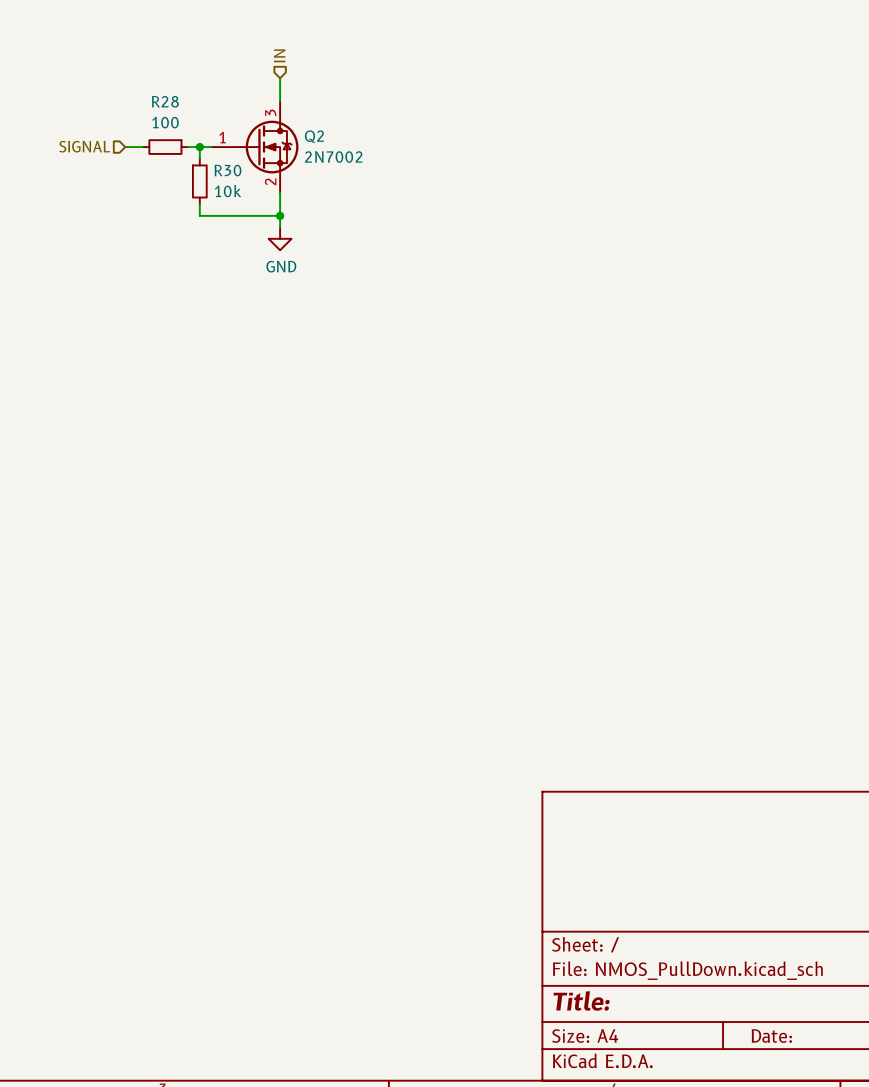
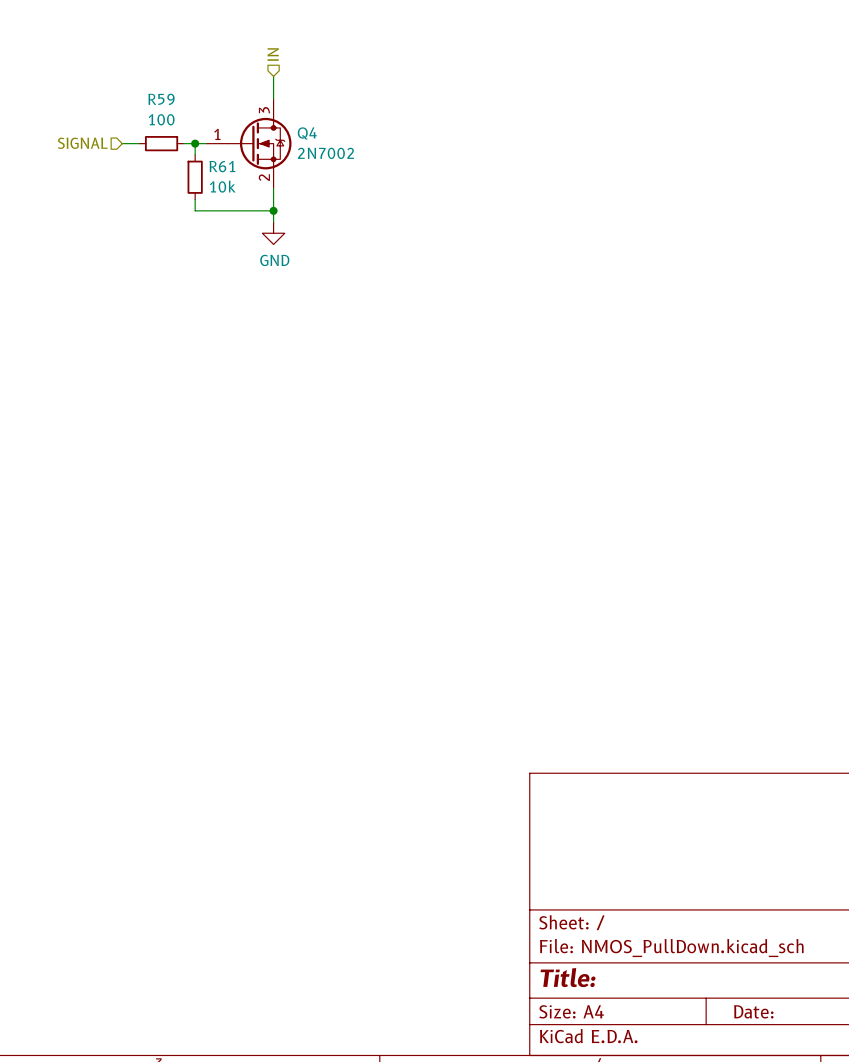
R28 name: R28 (165, 101) -> R59 (161, 99)
Q2 name: Q2 (314, 136) -> Q4 (307, 133)
R30 name: R30 (227, 170) -> R61 (222, 166)

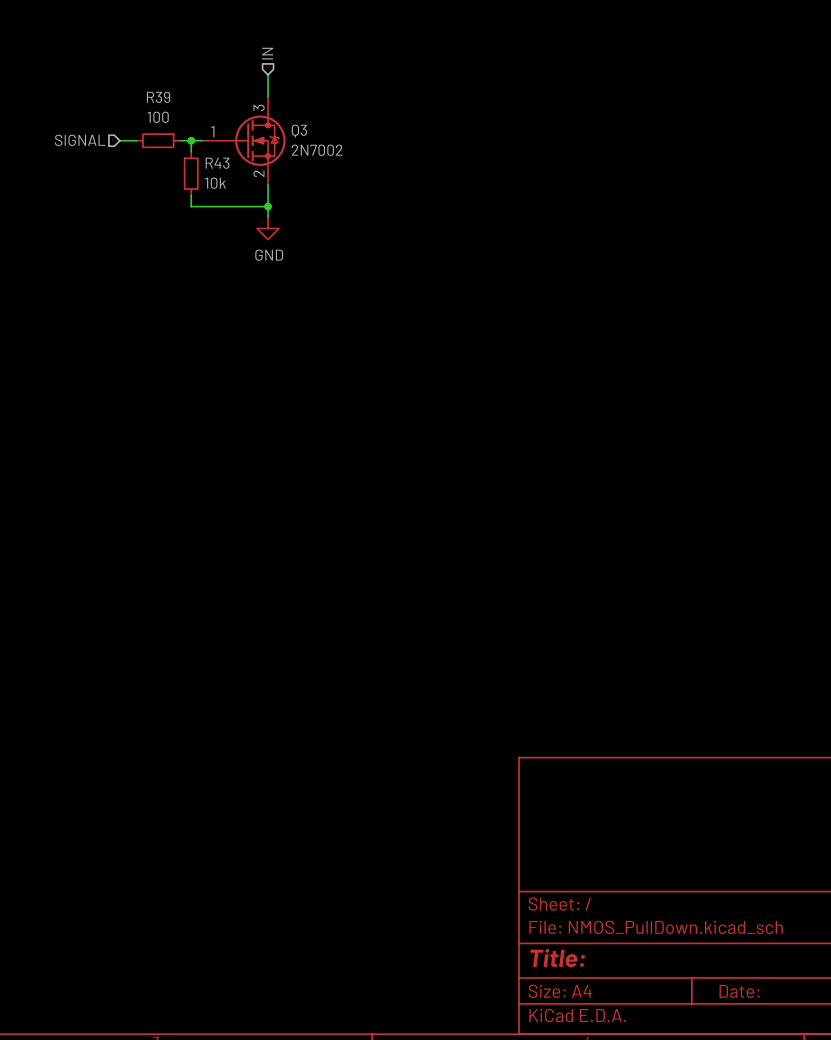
R59 name: R59 (161, 99) -> R39 (158, 97)
Q4 name: Q4 (307, 133) -> Q3 (299, 131)
R61 name: R61 (222, 166) -> R43 (217, 163)

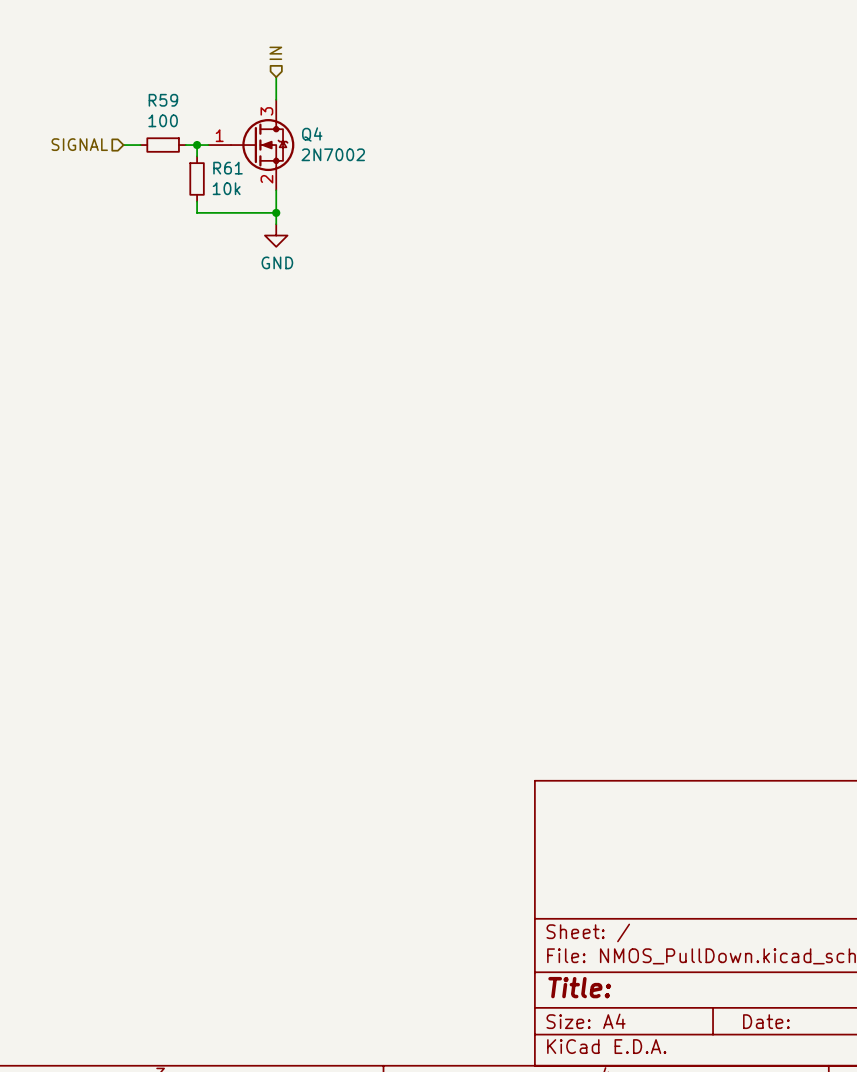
R39 name: R39 (158, 97) -> R59 (163, 100)
Q3 name: Q3 (299, 131) -> Q4 (312, 134)
R43 name: R43 (217, 163) -> R61 (228, 168)

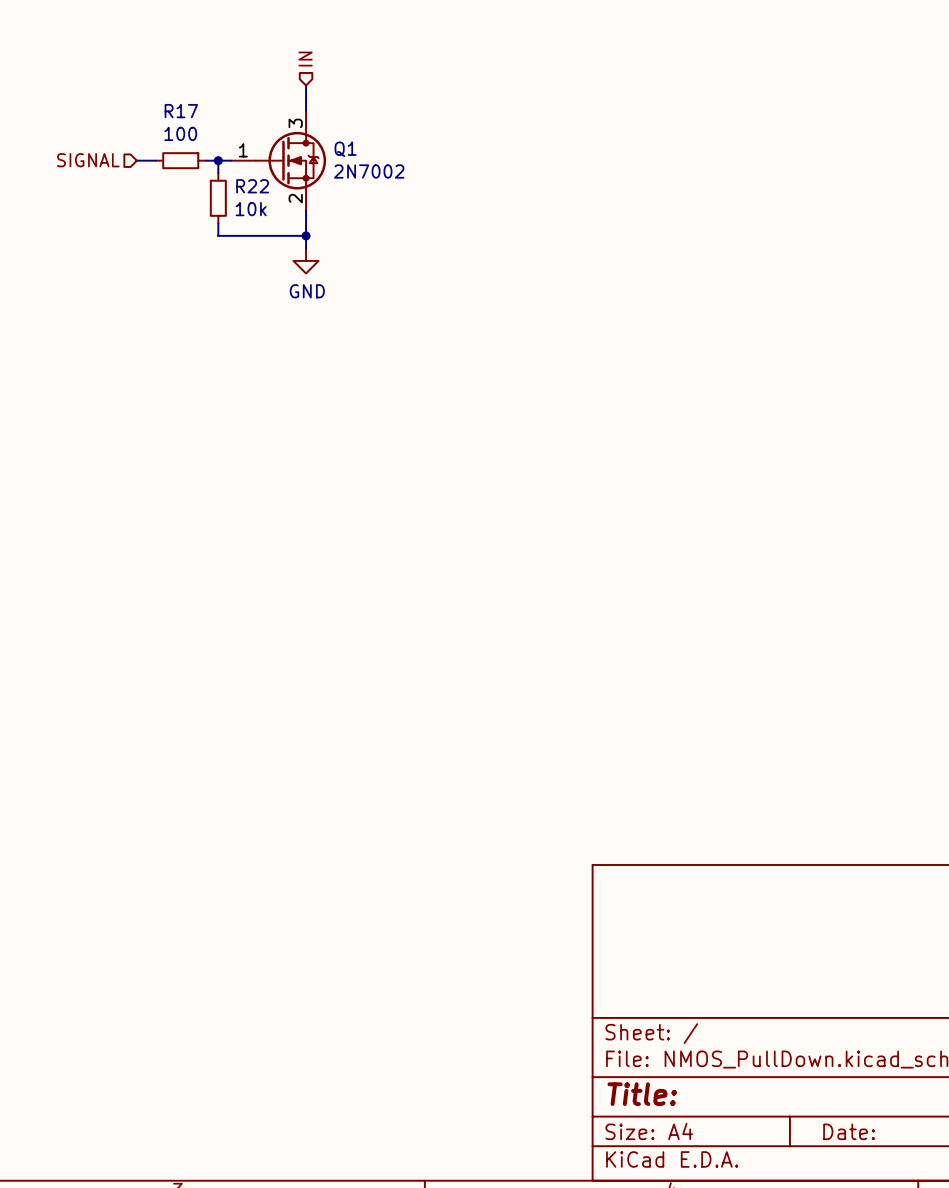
R59 name: R59 (163, 100) -> R17 (181, 111)
Q4 name: Q4 (312, 134) -> Q1 (345, 149)
R61 name: R61 (228, 168) -> R22 (252, 186)

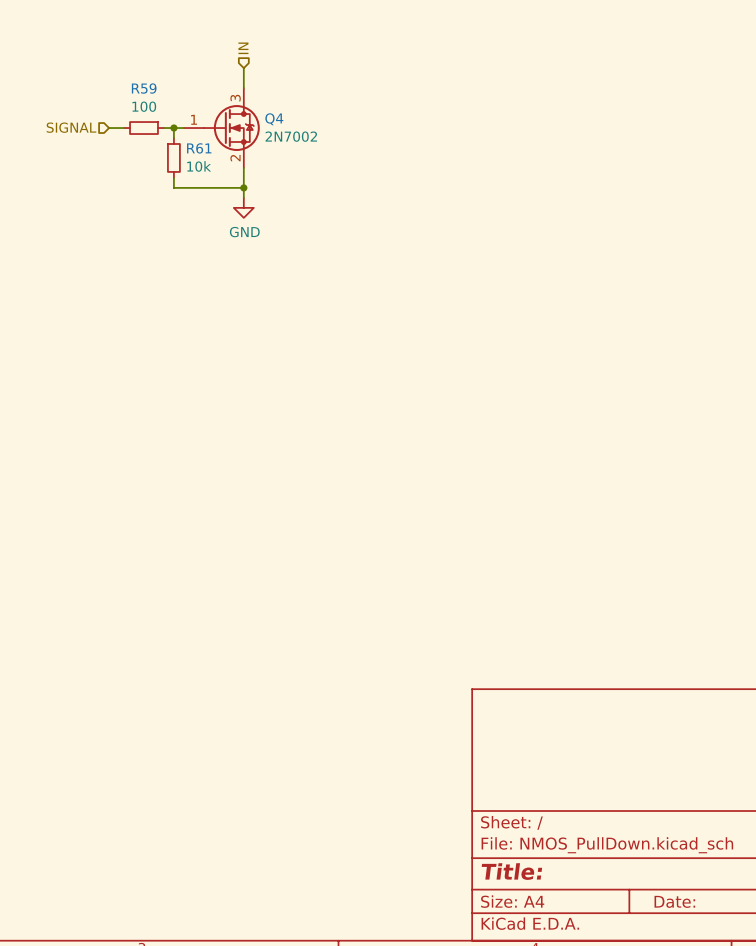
R17 name: R17 (181, 111) -> R59 (144, 88)
Q1 name: Q1 (345, 149) -> Q4 (274, 119)
R22 name: R22 (252, 186) -> R61 (199, 148)

